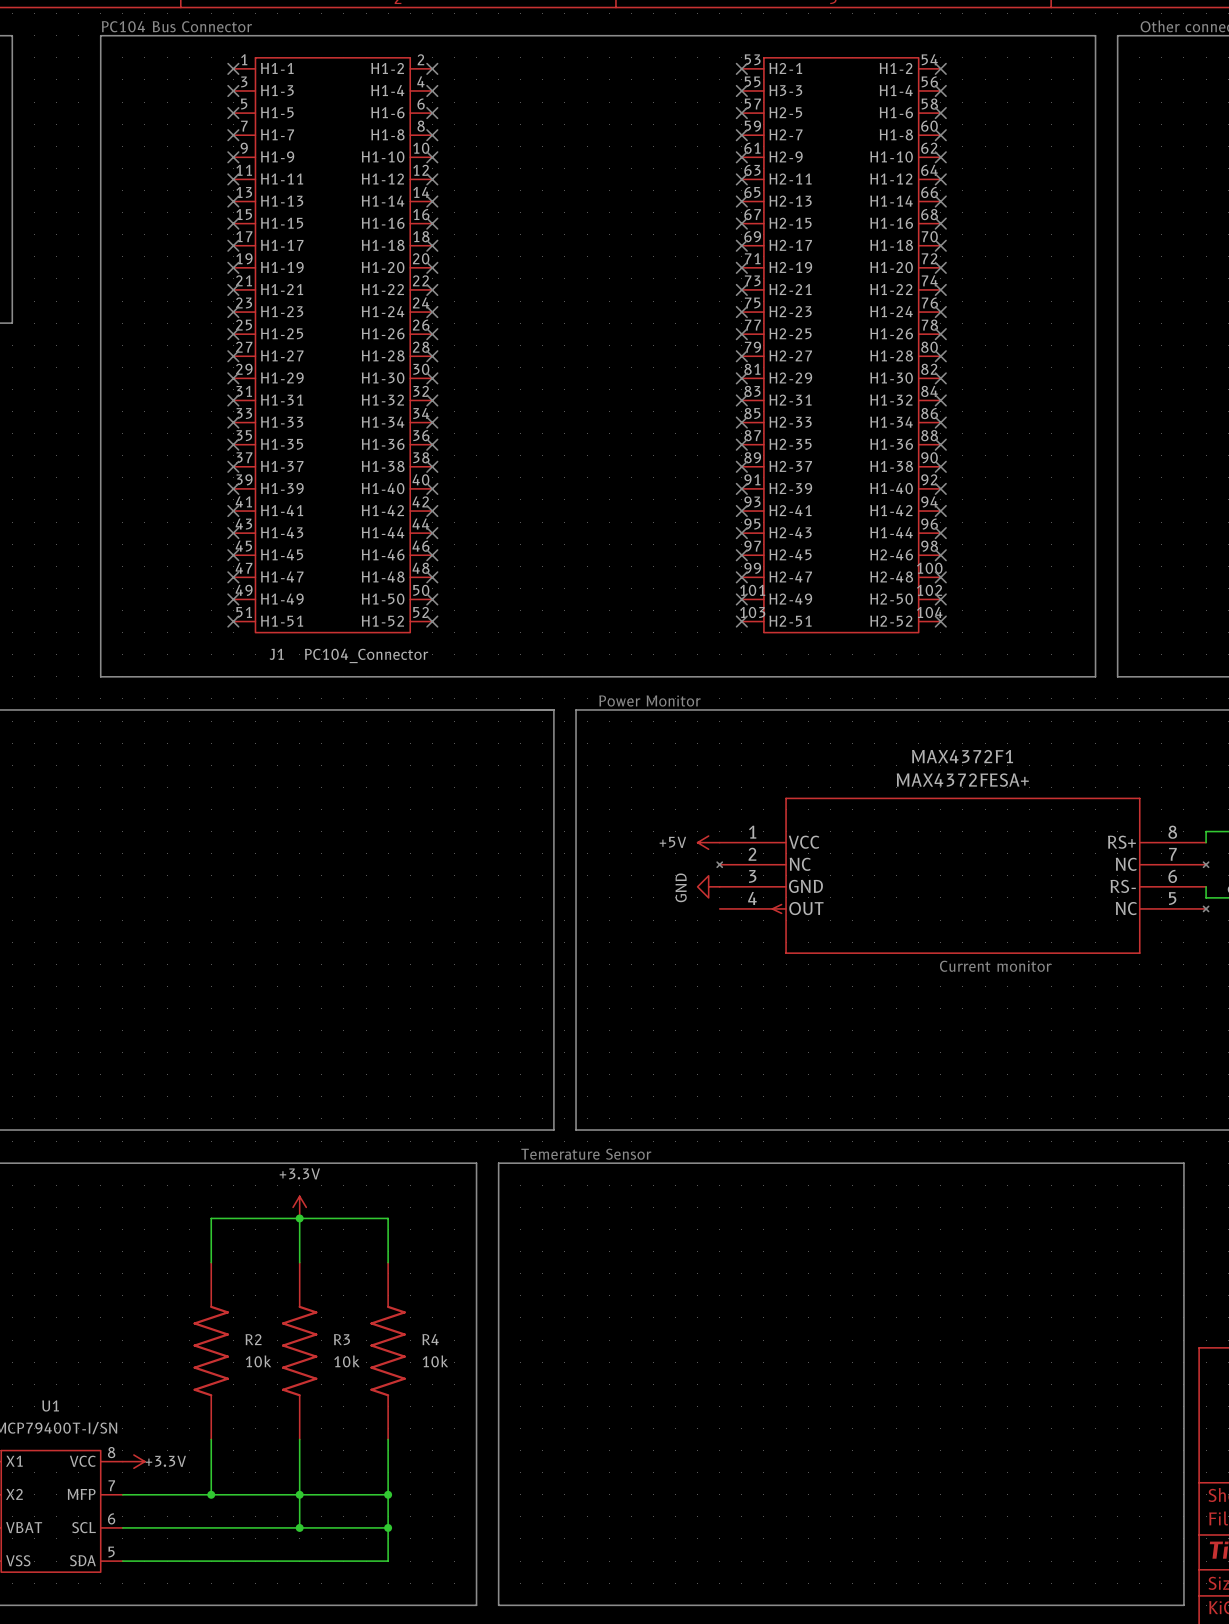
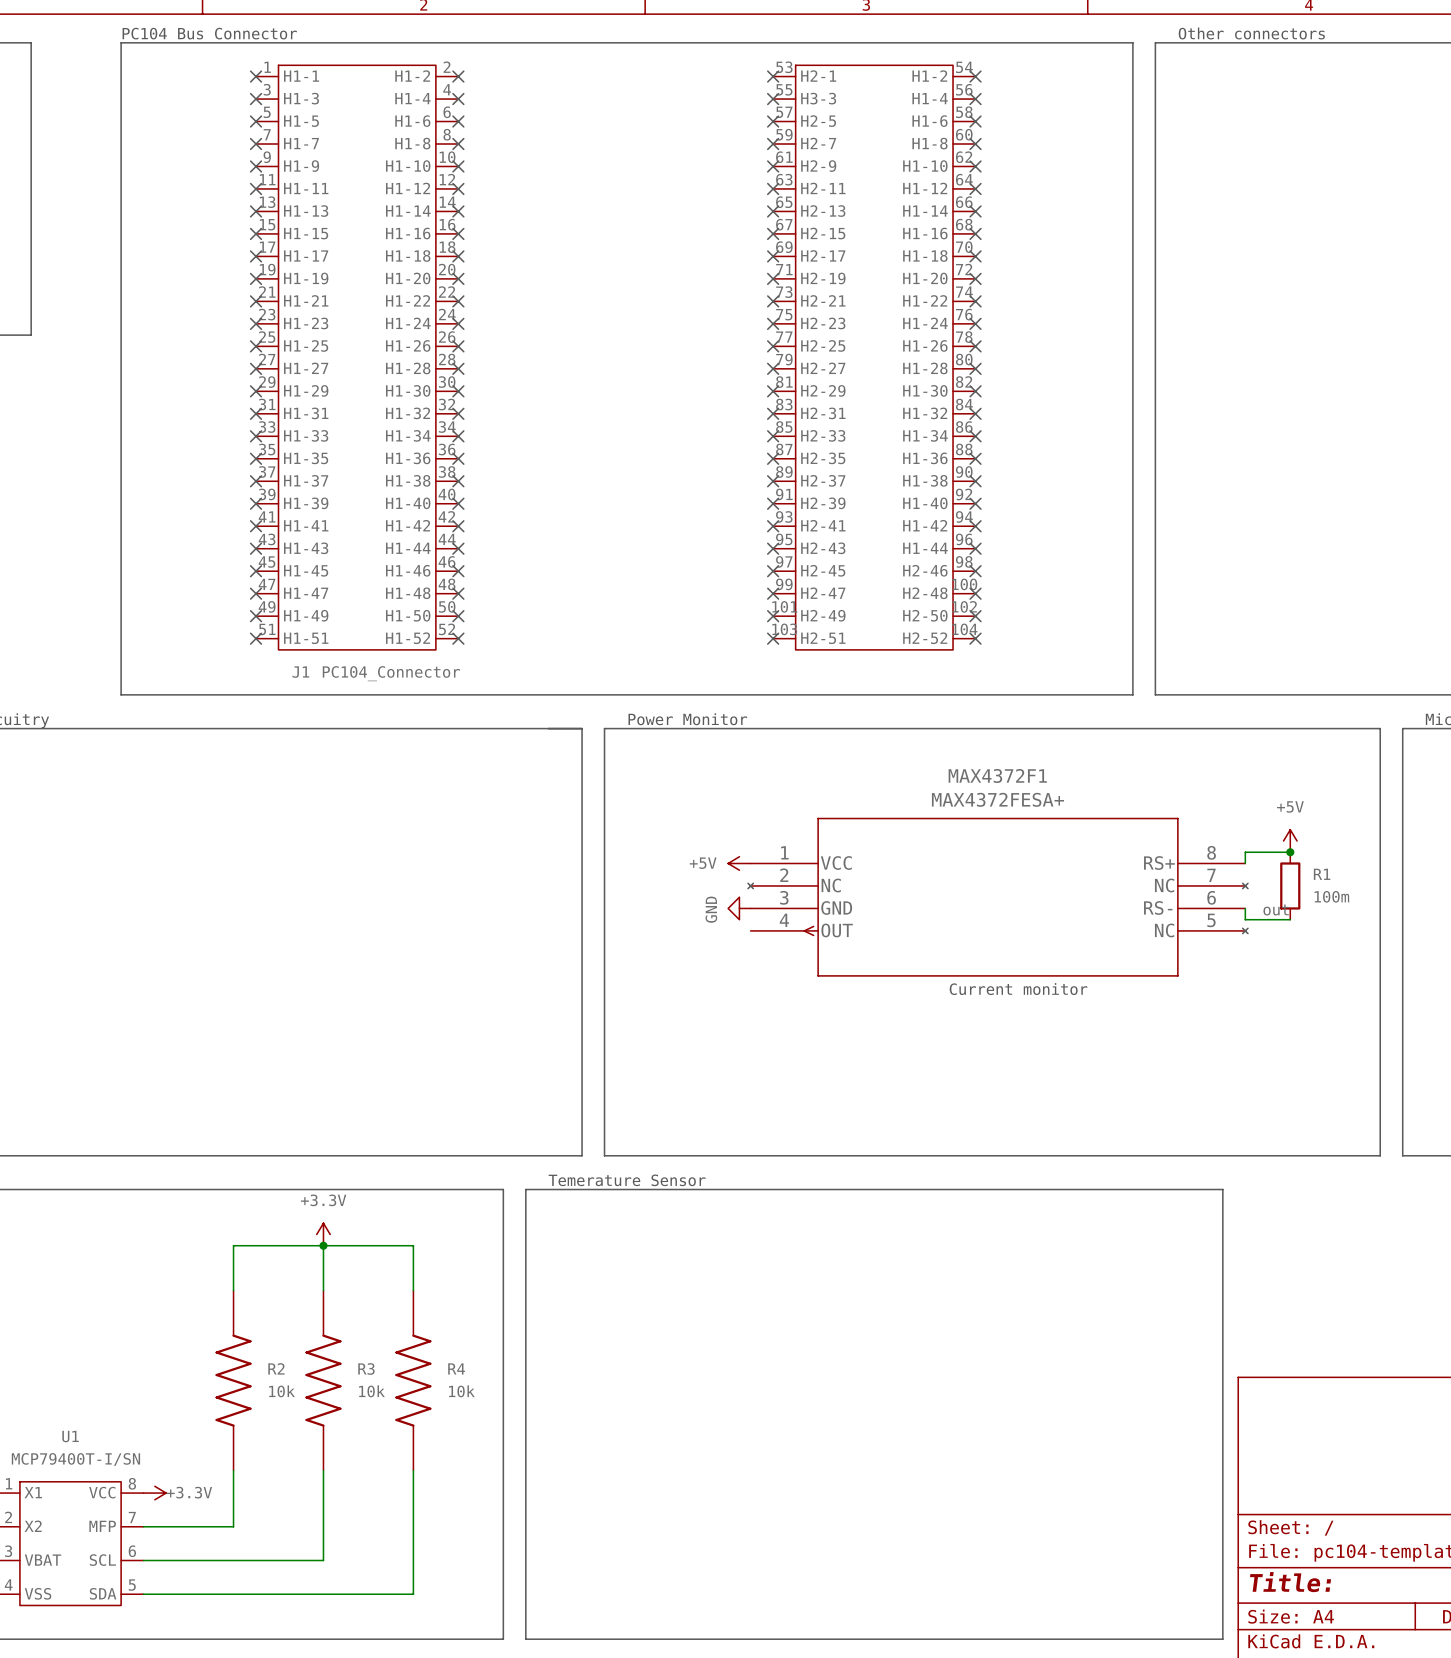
wire: (211, 1494) (388, 1494) -> none
junction: (211, 1494) -> none
junction: (299, 1494) -> none
junction: (388, 1494) -> none
wire: (299, 1527) (388, 1527) -> none
junction: (299, 1527) -> none
junction: (388, 1527) -> none

